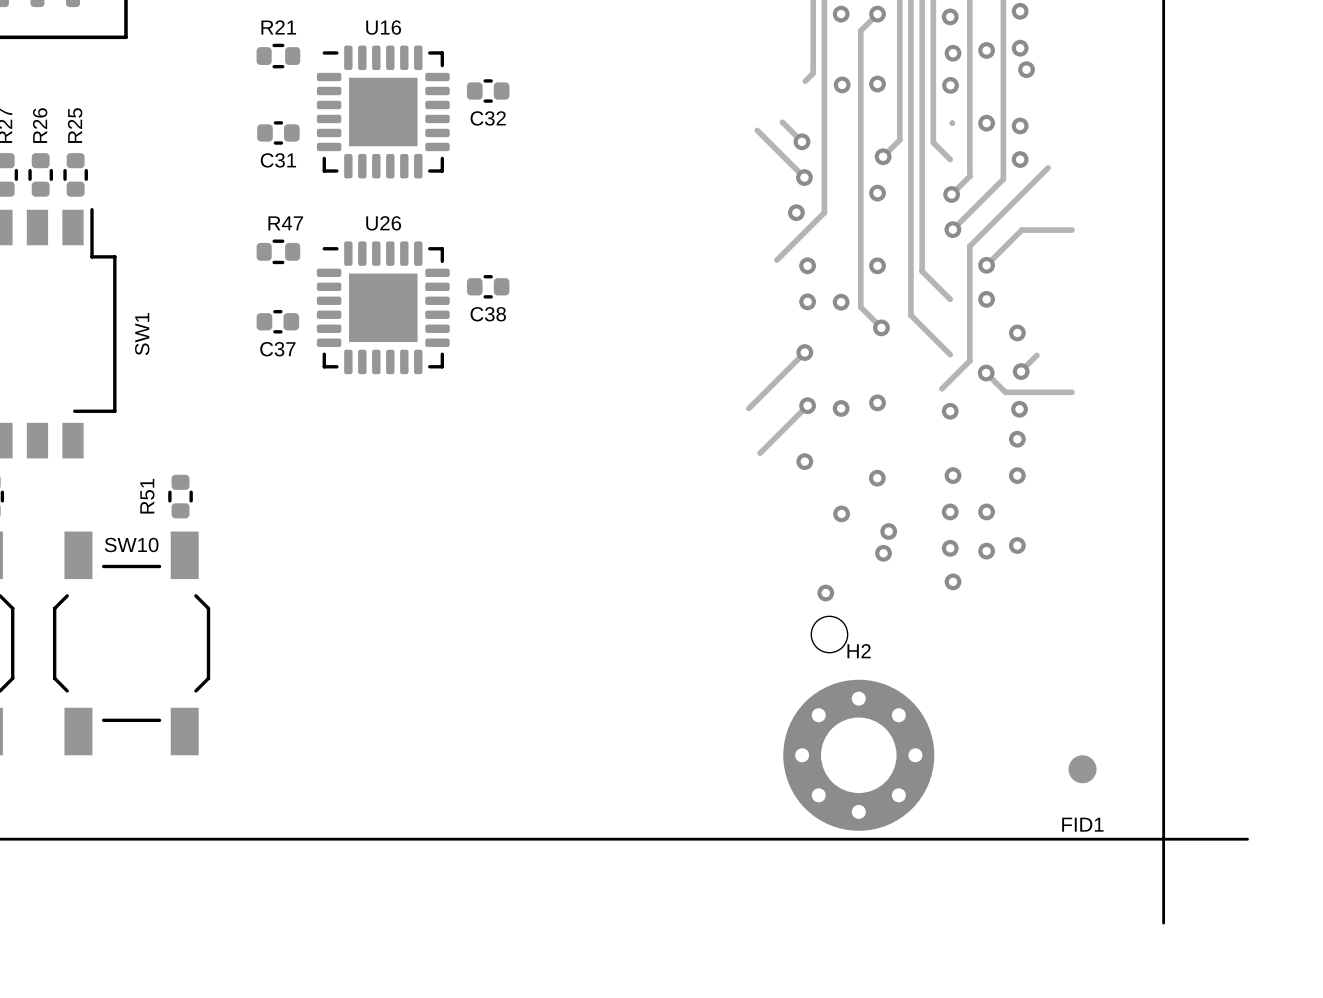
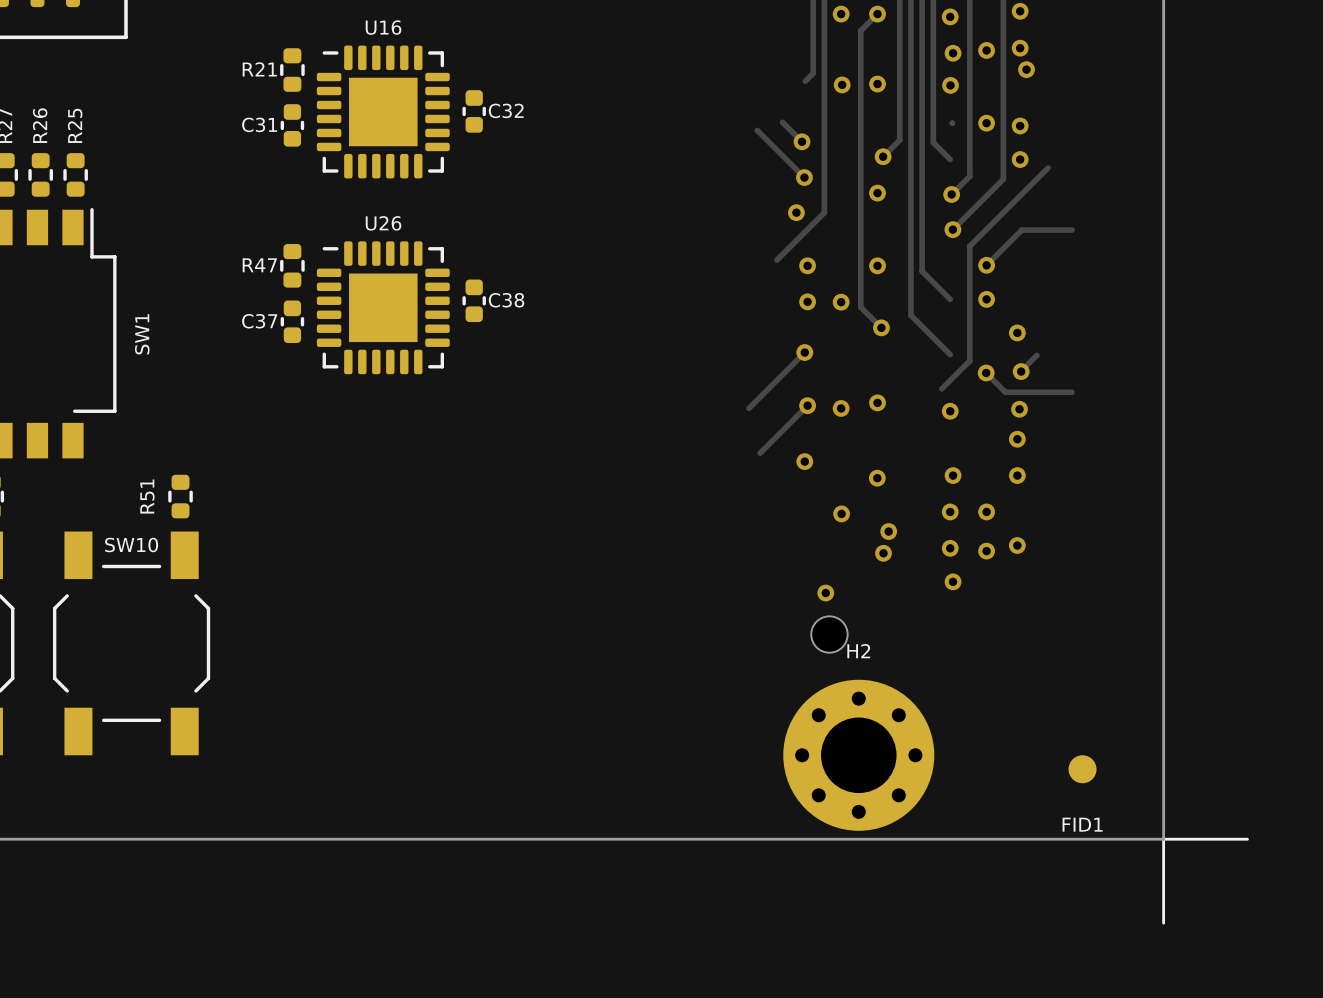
R21 rotation: 0° (278, 56) -> 90° clockwise (292, 70)
C32 rotation: 0° (488, 91) -> 90° clockwise (474, 111)
C31 rotation: 0° (278, 132) -> 90° clockwise (292, 125)
R47 rotation: 0° (278, 251) -> 90° clockwise (292, 265)
C38 rotation: 0° (488, 286) -> 90° clockwise (474, 300)
C37 rotation: 0° (277, 321) -> 90° clockwise (292, 321)

